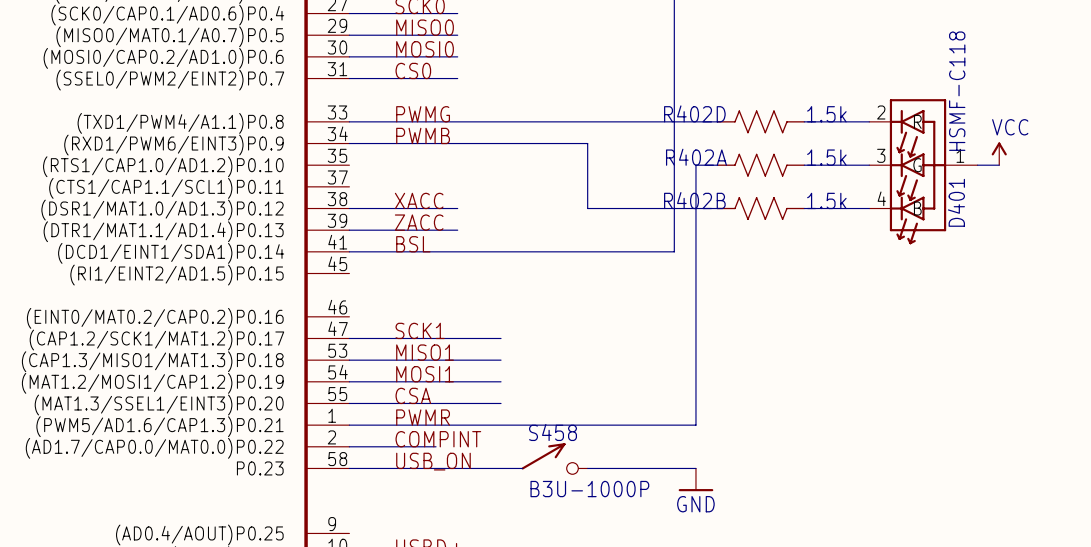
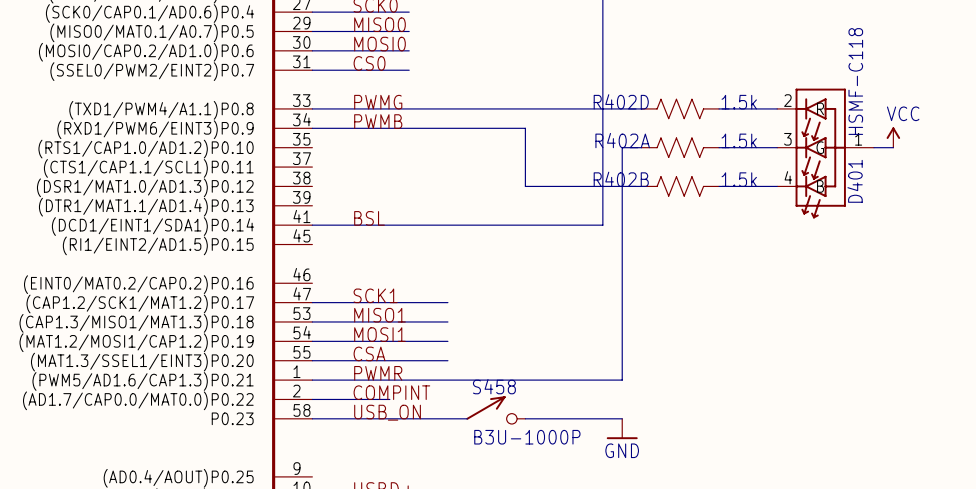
label: XACC (419, 200) -> none
wire: (349, 208) (457, 208) -> none
label: ZACC (419, 222) -> none
wire: (349, 230) (457, 230) -> none

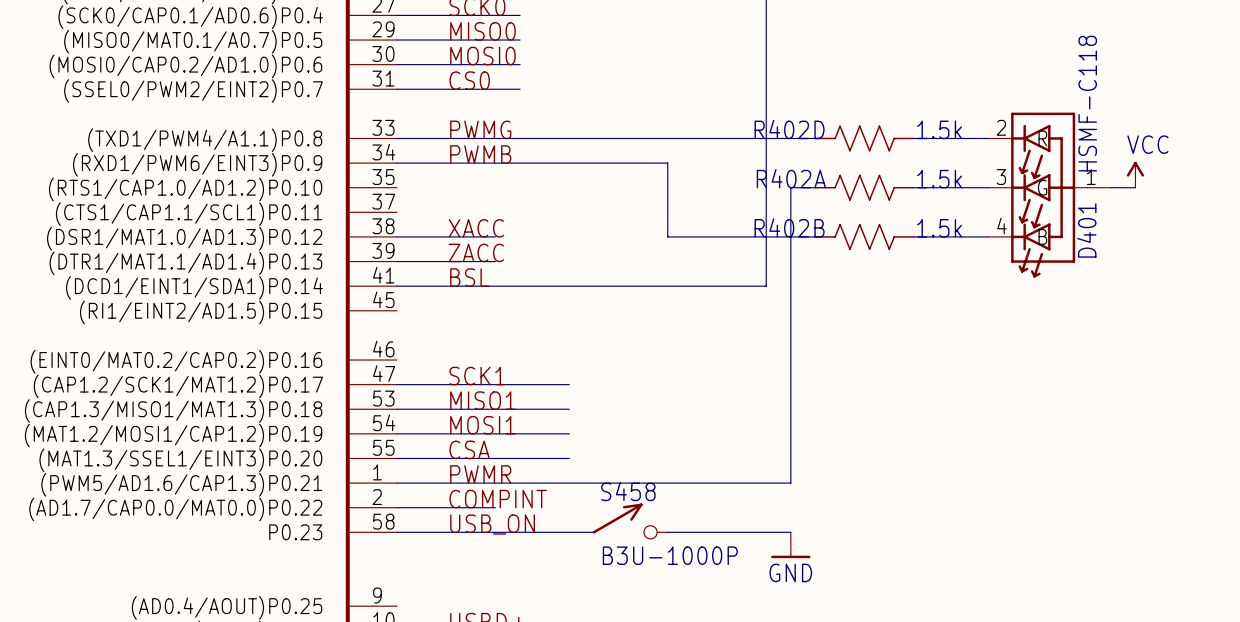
label: none -> XACC (476, 228)
wire: none -> (397, 236) (495, 236)
label: none -> ZACC (476, 252)
wire: none -> (397, 261) (495, 261)

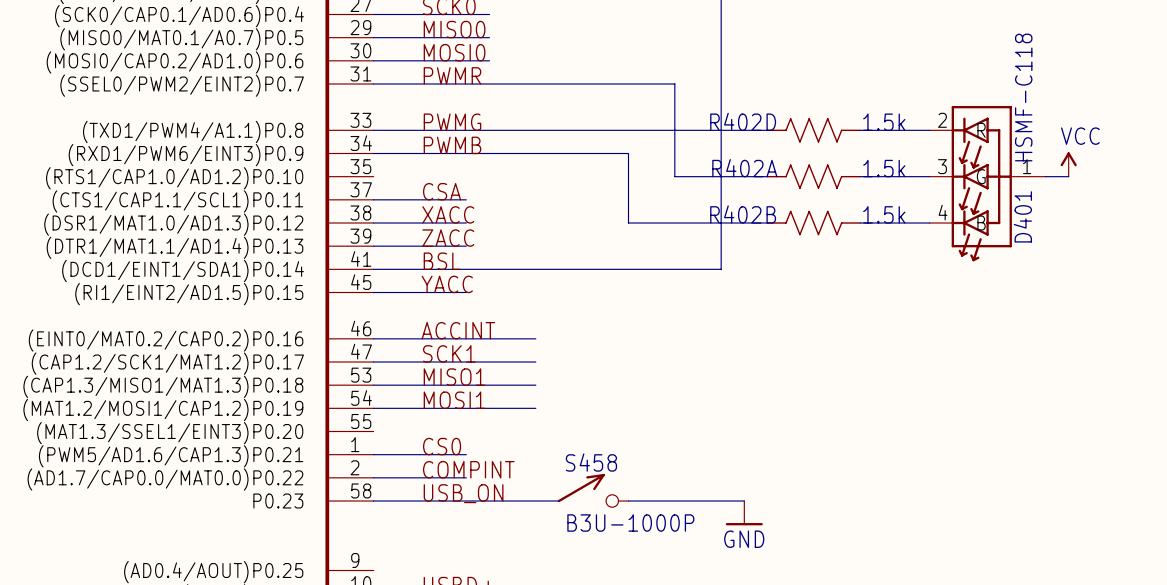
label: CS0 (469, 80) -> PWMR (452, 75)
wire: (790, 187) (790, 483) (495, 483) -> (744, 176) (674, 176) (674, 84) (489, 84)
label: none -> CSA (442, 191)
wire: none -> (373, 199) (466, 199)
label: none -> YACC (447, 284)
wire: none -> (373, 292) (466, 292)
label: none -> ACCINT (458, 330)
label: CSA (469, 449) -> none
wire: (397, 458) (569, 458) -> (373, 338) (535, 338)
label: PWMR (480, 474) -> CS0 (442, 446)

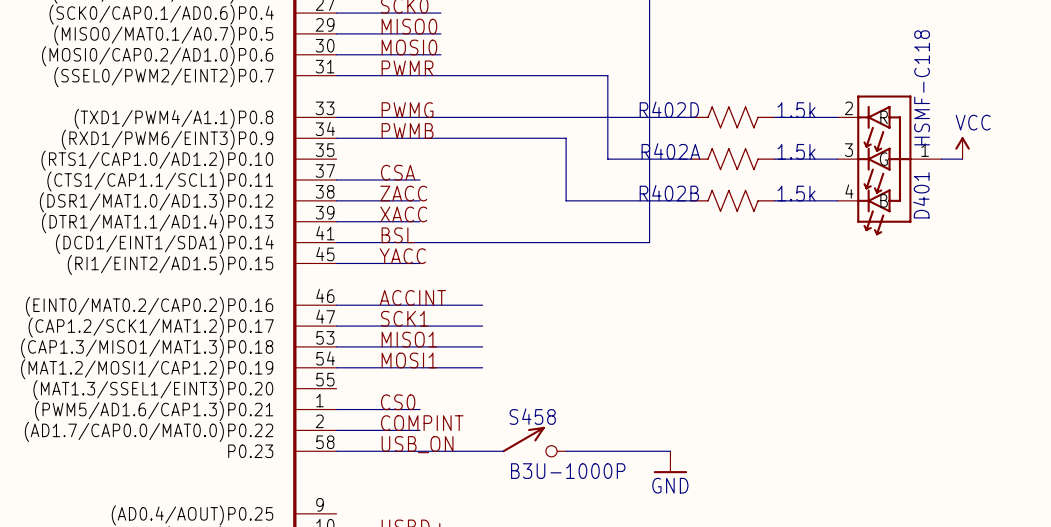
label: XACC (448, 214) -> ZACC (403, 193)
label: ZACC (448, 238) -> XACC (403, 214)

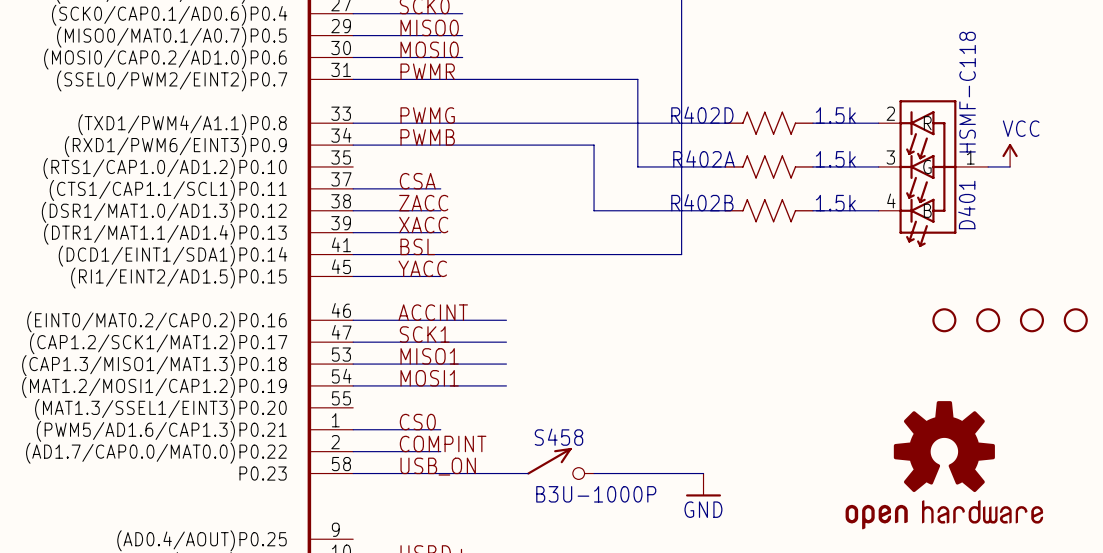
part: none -> (944, 320)
part: none -> (988, 320)
part: none -> (1031, 320)
part: none -> (1075, 320)
part: none -> (944, 465)

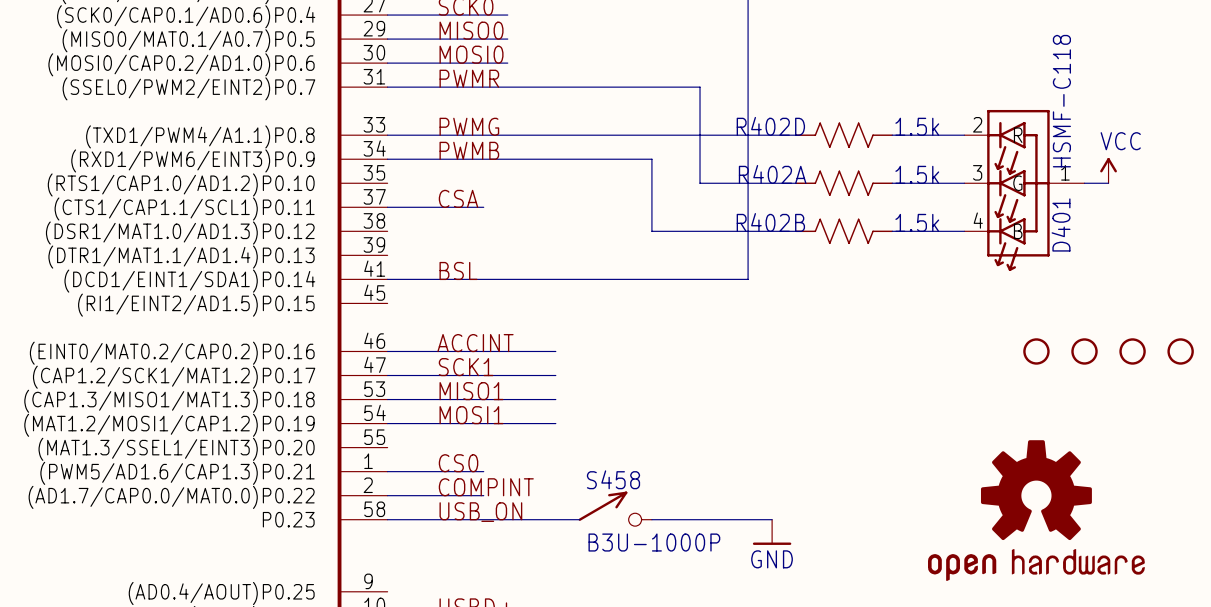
label: ZACC (423, 203) -> none
wire: (353, 210) (440, 210) -> none
label: XACC (423, 225) -> none
wire: (353, 232) (440, 232) -> none
label: YACC (422, 268) -> none
wire: (353, 276) (440, 276) -> none

